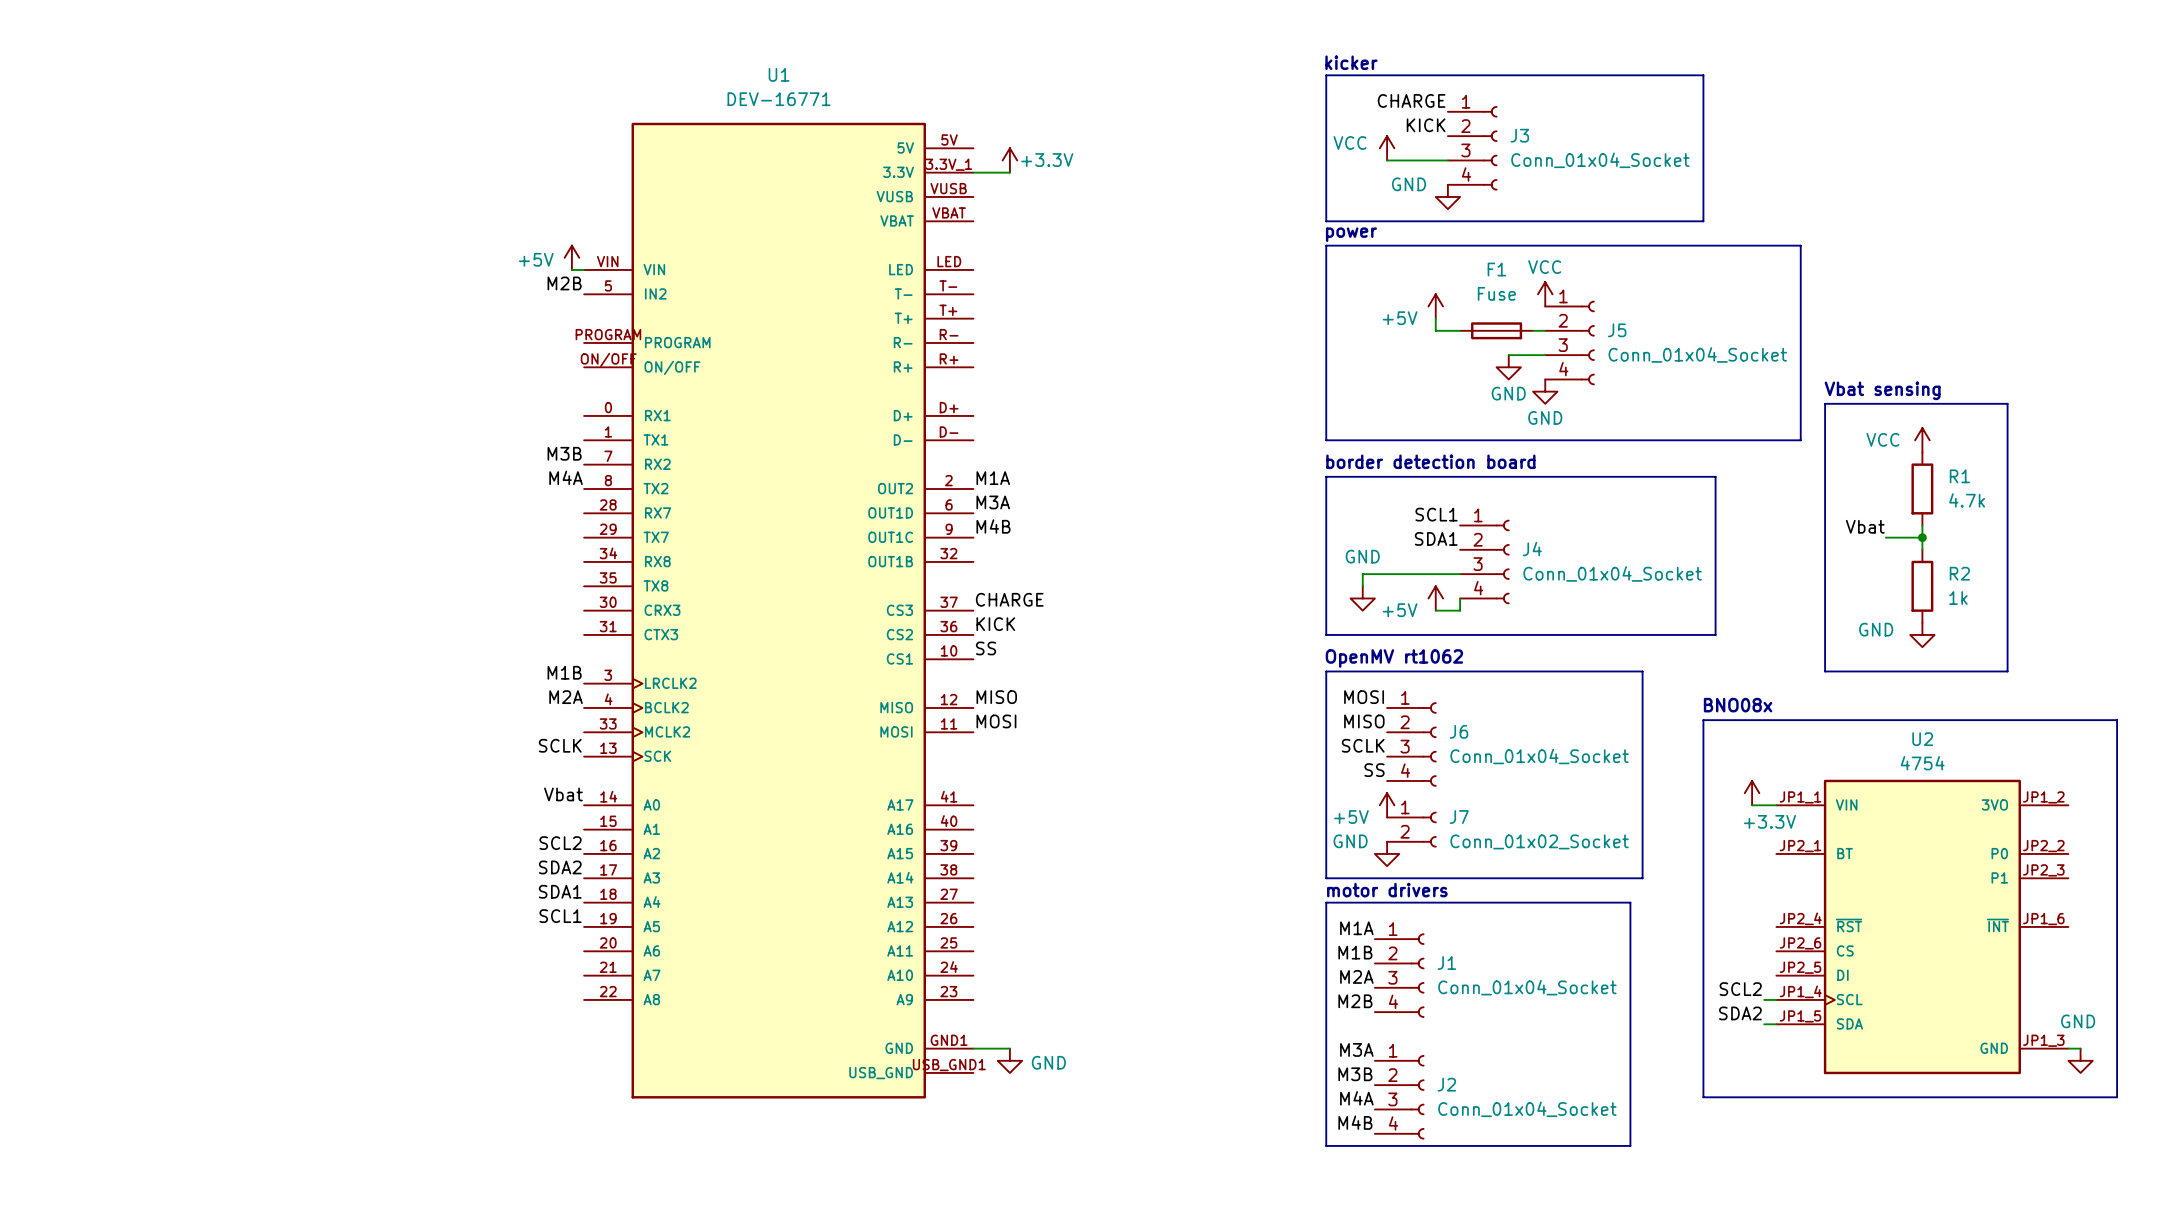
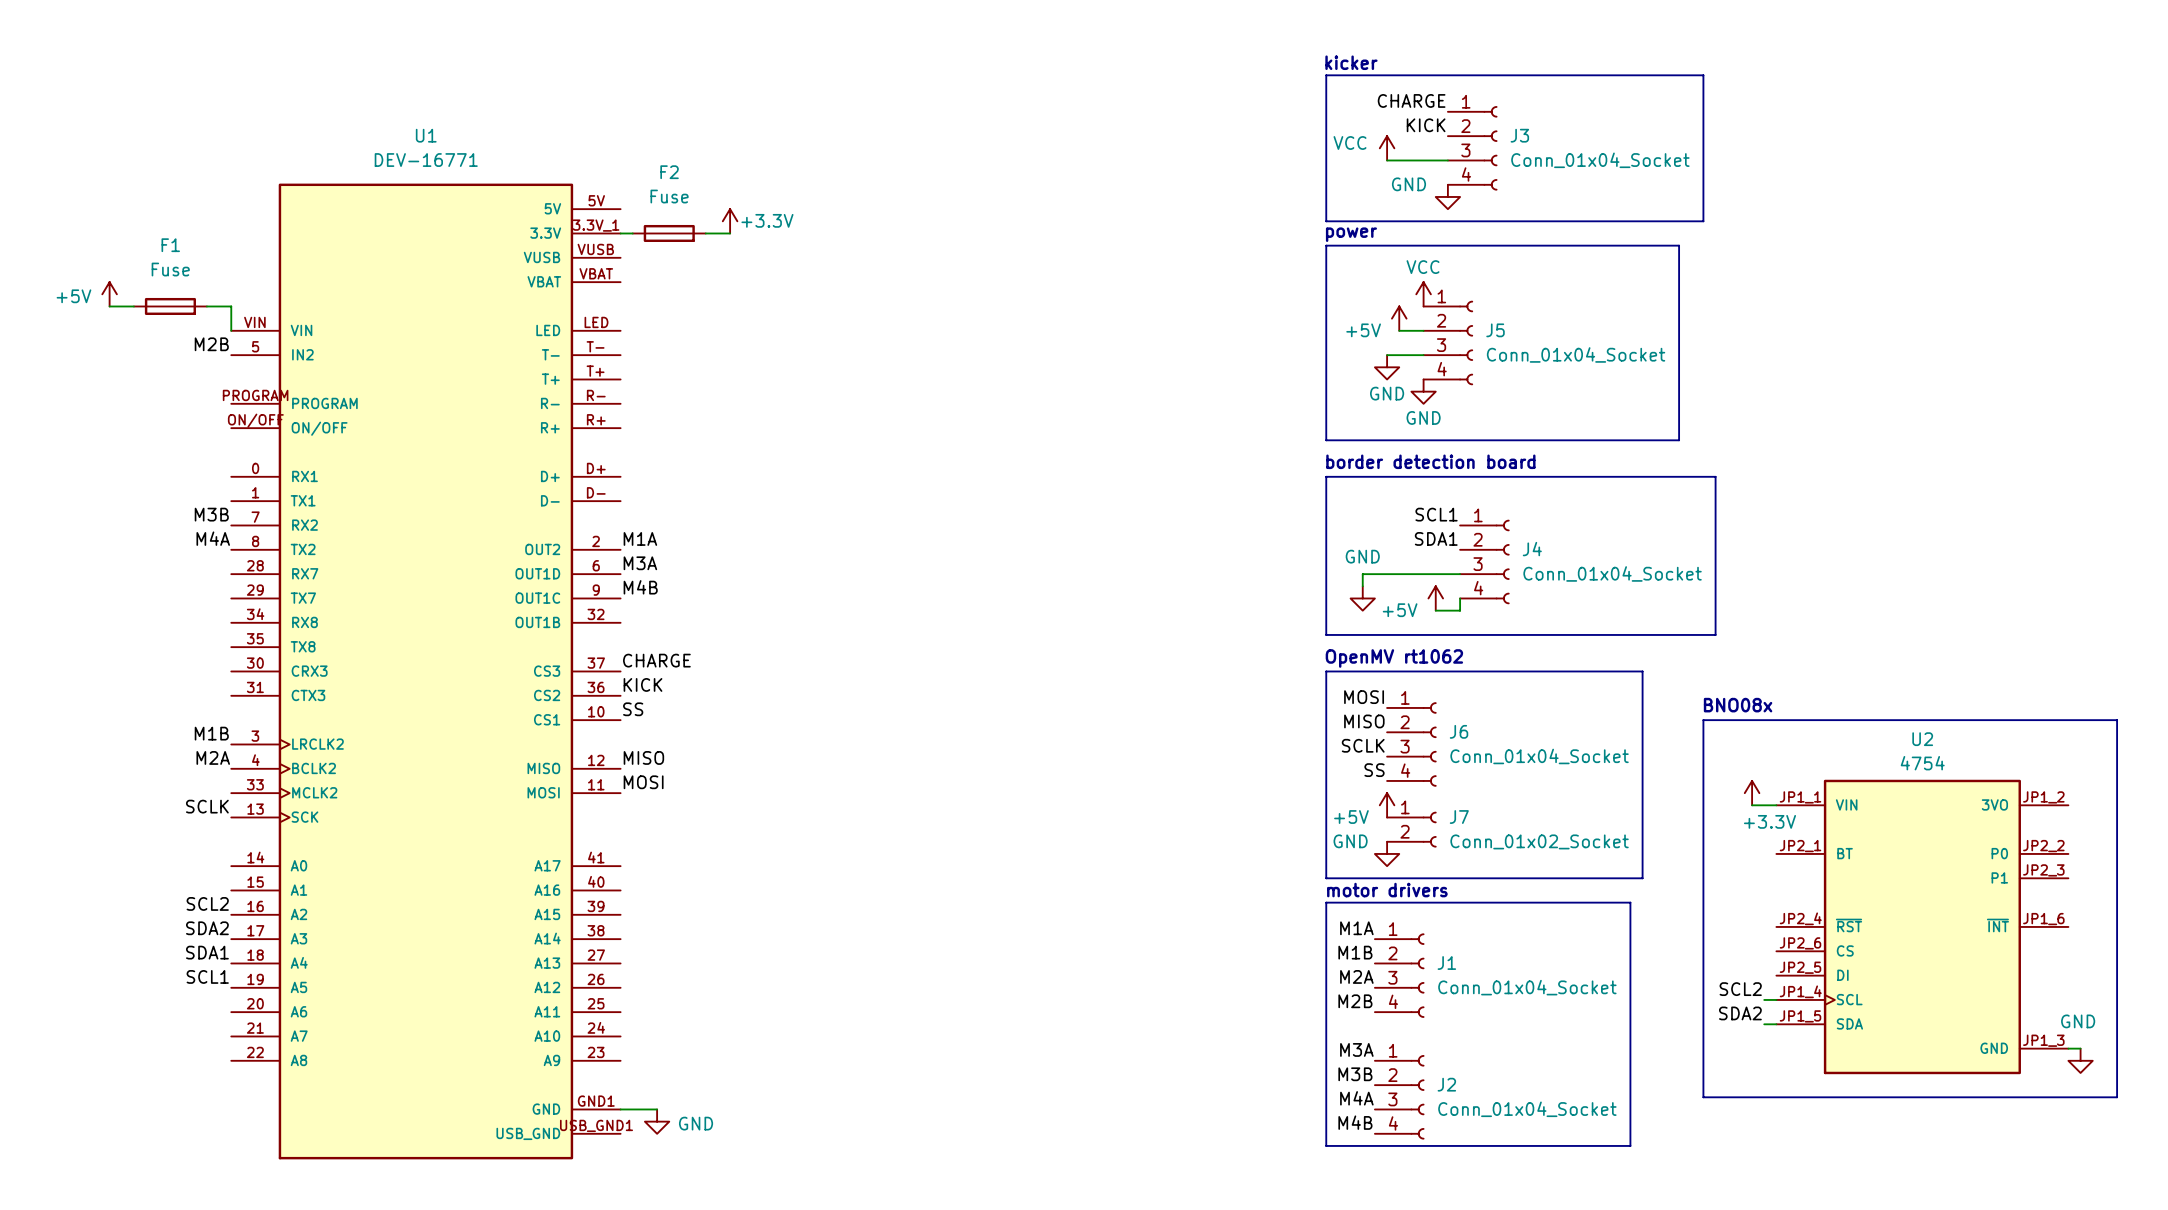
power symbol: +3.3V (1009, 160) -> none
wire: (973, 172) (1009, 172) -> none
power symbol: none -> +3.3V (730, 221)
F2: none -> Fuse (669, 233)
line: (1679, 245) (1800, 245) (1800, 440) (1679, 440) -> (1679, 245) (1679, 440)
power symbol: +5V (571, 257) -> none
wire: (571, 269) (584, 269) -> (620, 233) (632, 233)
label: M2B (564, 283) -> none
power symbol: none -> +5V (109, 294)
power symbol position: VCC (1545, 294) -> VCC (1423, 294)
wire: none -> (109, 306) (133, 306)
wire: none -> (206, 306) (231, 306) (231, 330)
power symbol position: +5V (1435, 306) -> +5V (1399, 318)
wire: none -> (1399, 330) (1423, 330)
F1 position: (1496, 330) -> (170, 306)
wire: (1533, 330) (1545, 330) -> none
J5 position: (1569, 342) -> (1448, 342)
label: none -> M2B (211, 344)
wire: (1508, 355) (1545, 355) -> (1387, 355) (1423, 355)
power symbol: none -> GND (1387, 367)
power symbol: GND (1508, 367) -> none
text: Vbat sensing (1882, 390) -> none
power symbol: none -> GND (1423, 391)
power symbol: GND (1545, 391) -> none
line: (1825, 403) (2007, 403) (2007, 671) (1825, 671) (1825, 403) -> none
power symbol: VCC (1922, 440) -> none
label: M3B (564, 453) -> none
label: M4A (566, 477) -> none
label: M1A (993, 478) -> none
R1: 4.7k (1922, 488) -> none
label: M3A (993, 502) -> none
label: none -> M3B (211, 514)
wire: (1922, 525) (1922, 549) -> none
label: M4B (993, 526) -> none
label: Vbat (1865, 526) -> none
wire: (1885, 537) (1922, 537) -> none
junction: (1922, 537) -> none
label: none -> M4A (213, 538)
label: none -> M1A (640, 538)
label: none -> M3A (640, 563)
R2: 1k (1922, 586) -> none
label: none -> M4B (640, 587)
label: CHARGE (1009, 599) -> none
U1 position: (778, 610) -> (425, 671)
label: KICK (995, 624) -> none
power symbol: GND (1922, 634) -> none
label: SS (986, 648) -> none
label: none -> CHARGE (656, 660)
label: M1B (564, 672) -> none
label: none -> KICK (642, 684)
label: M2A (566, 697) -> none
label: MISO (996, 697) -> none
label: none -> SS (633, 709)
label: MOSI (996, 721) -> none
label: none -> M1B (211, 733)
label: SCLK (560, 745) -> none
label: none -> M2A (213, 757)
label: none -> MISO (643, 757)
label: none -> MOSI (643, 782)
label: Vbat (563, 794) -> none
label: none -> SCLK (207, 806)
label: SCL2 (560, 843) -> none
label: SDA2 (560, 867) -> none
label: SDA1 (560, 891) -> none
label: none -> SCL2 (207, 903)
label: SCL1 (560, 916) -> none
label: none -> SDA2 (207, 928)
label: none -> SDA1 (207, 952)
label: none -> SCL1 (207, 976)
wire: (973, 1048) (1009, 1048) -> none
power symbol: GND (1009, 1060) -> none
wire: none -> (620, 1109) (657, 1109)
power symbol: none -> GND (657, 1121)

